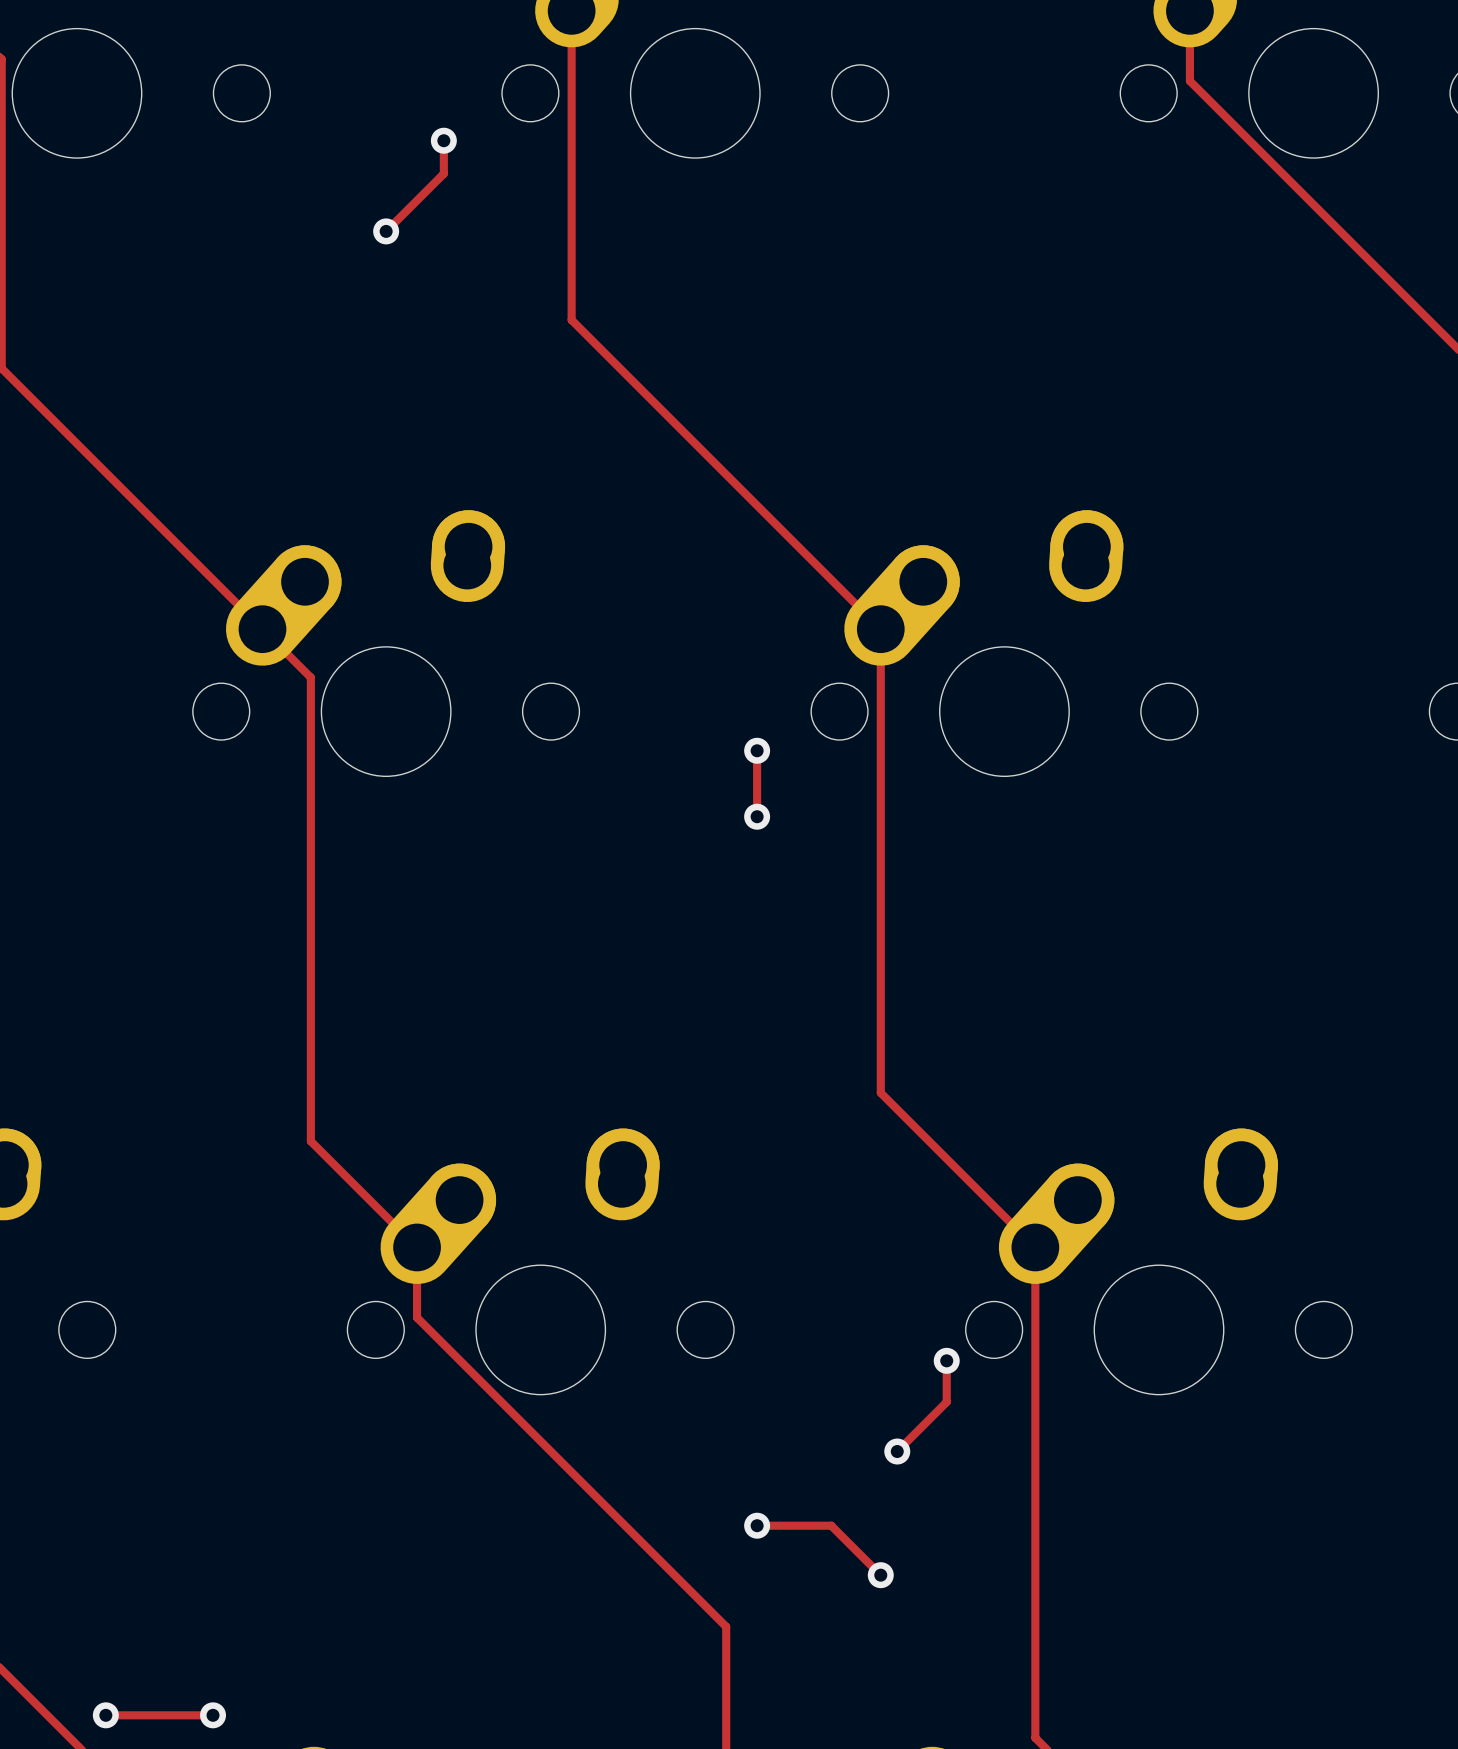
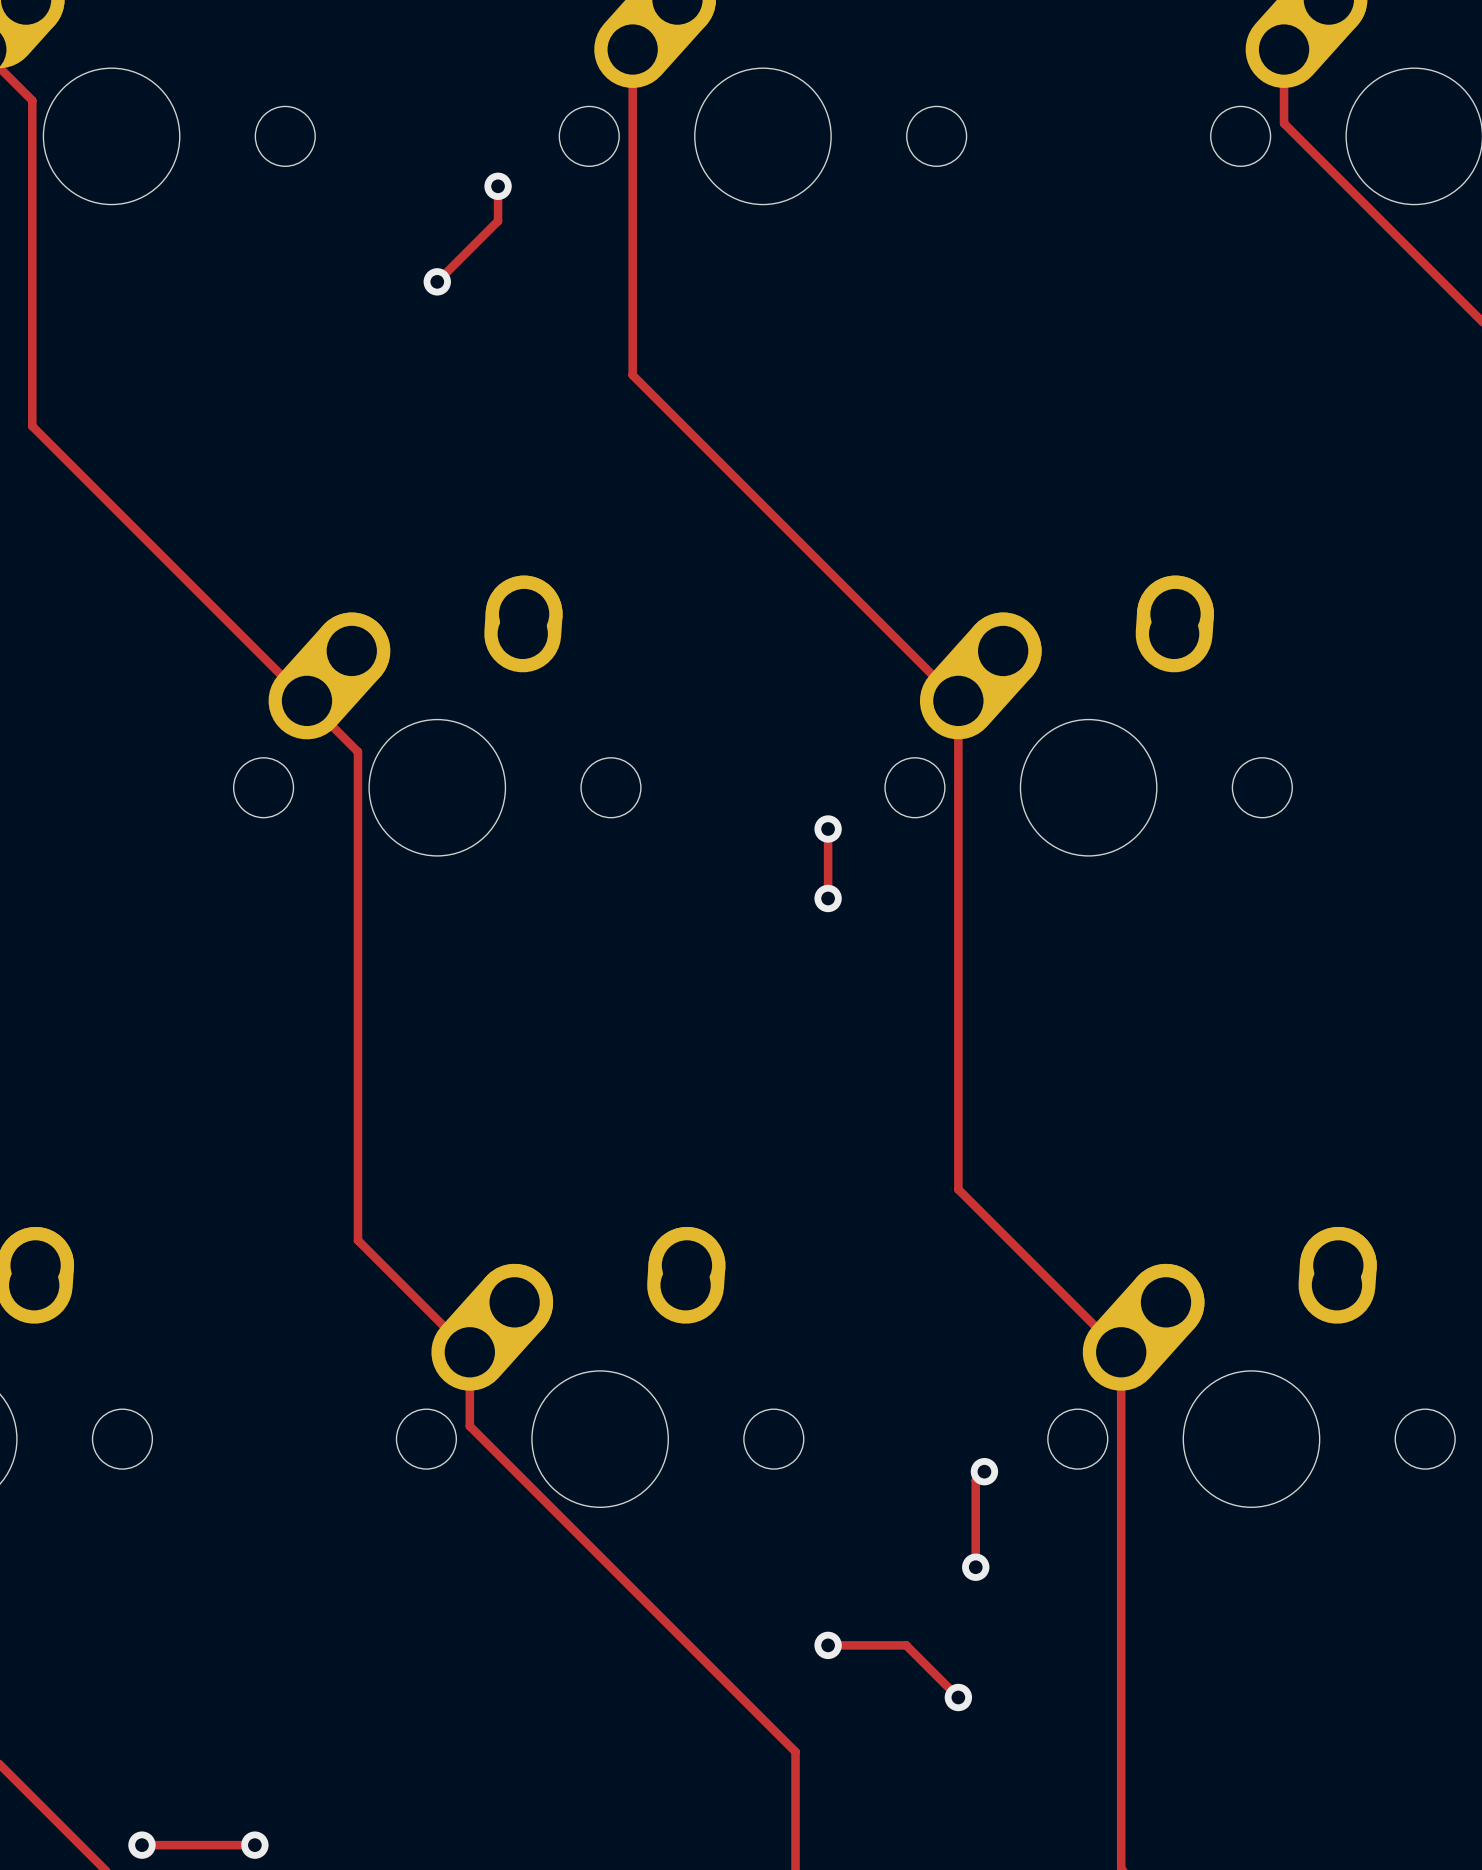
track: (946, 1360) (946, 1402) (897, 1451) -> (984, 1471) (975, 1480) (975, 1567)
via position: (946, 1360) -> (984, 1471)

